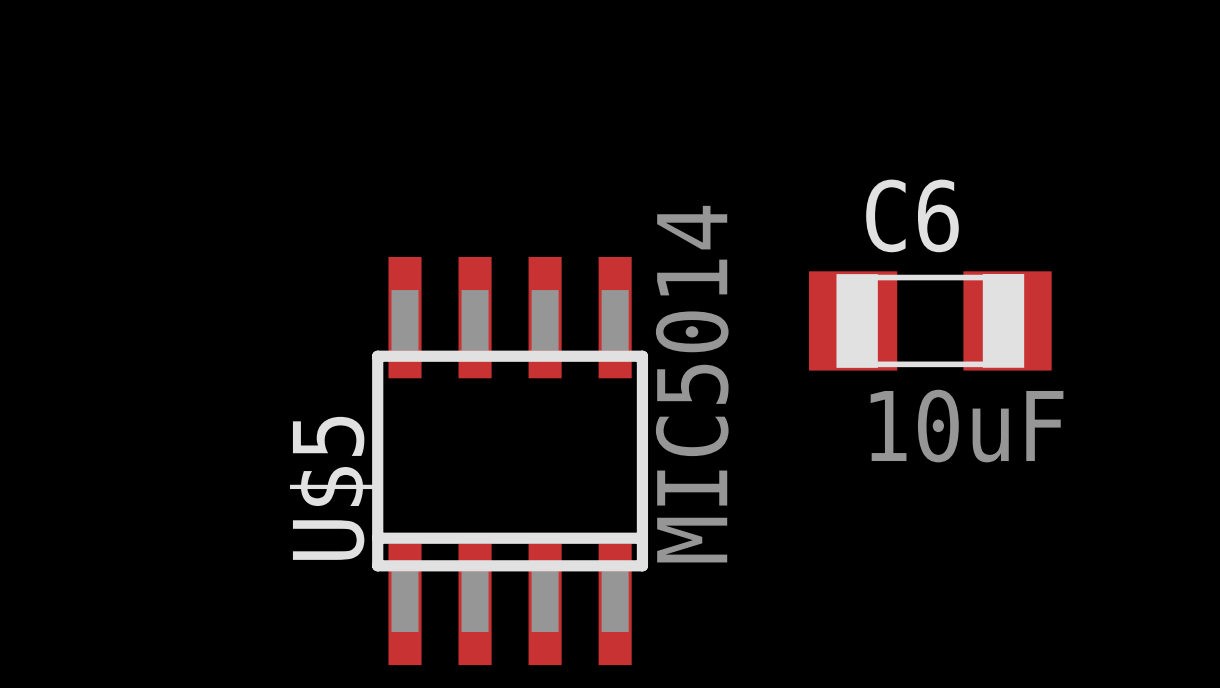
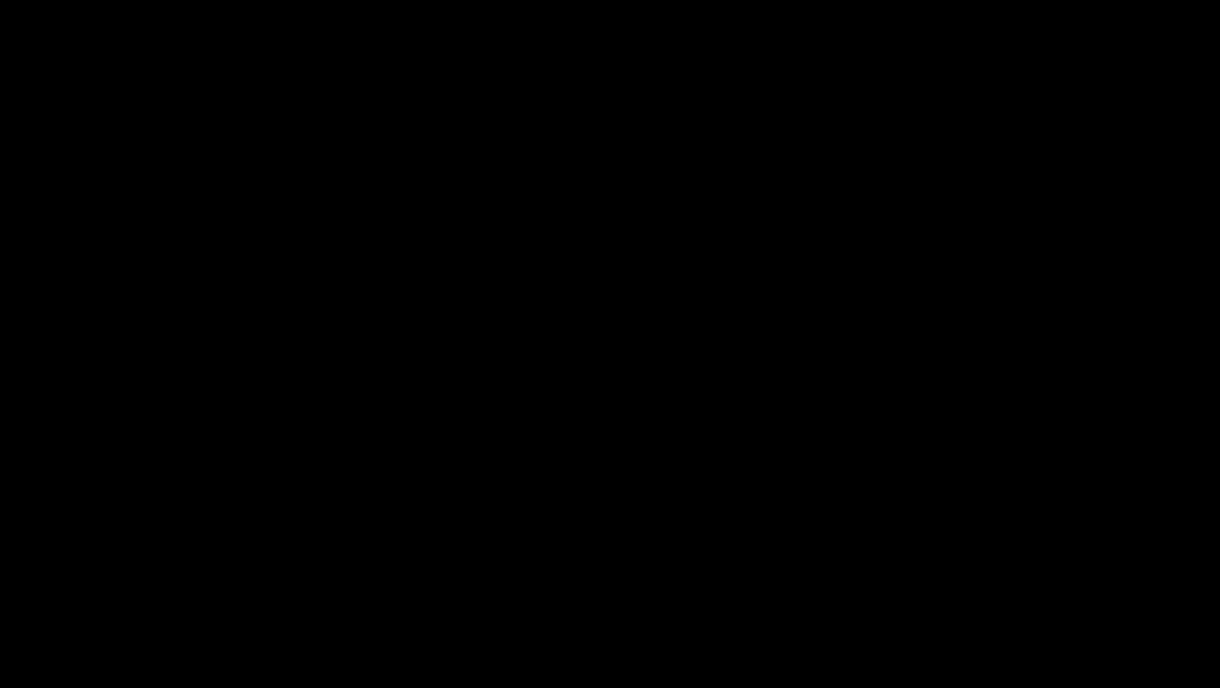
C6: 10uF (930, 320) -> none
U$5: MIC5014 (510, 461) -> none

